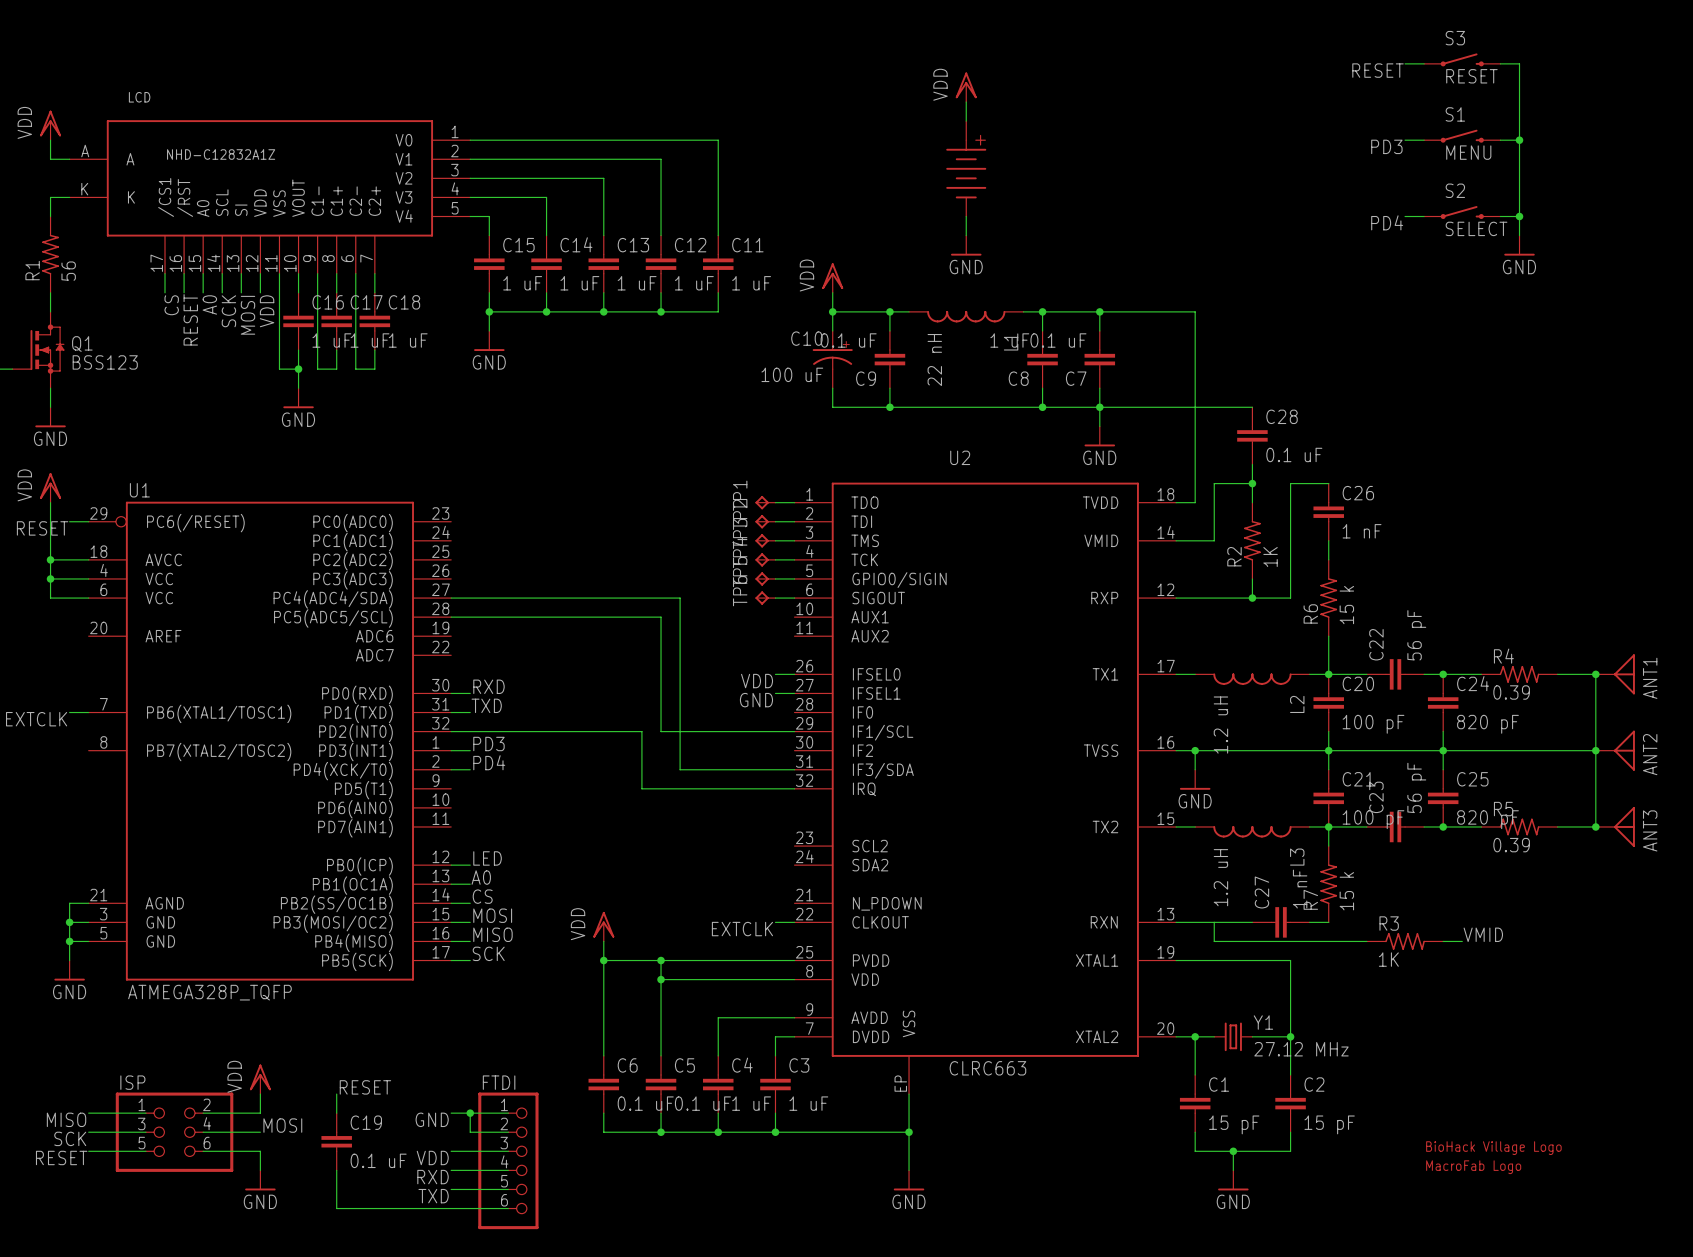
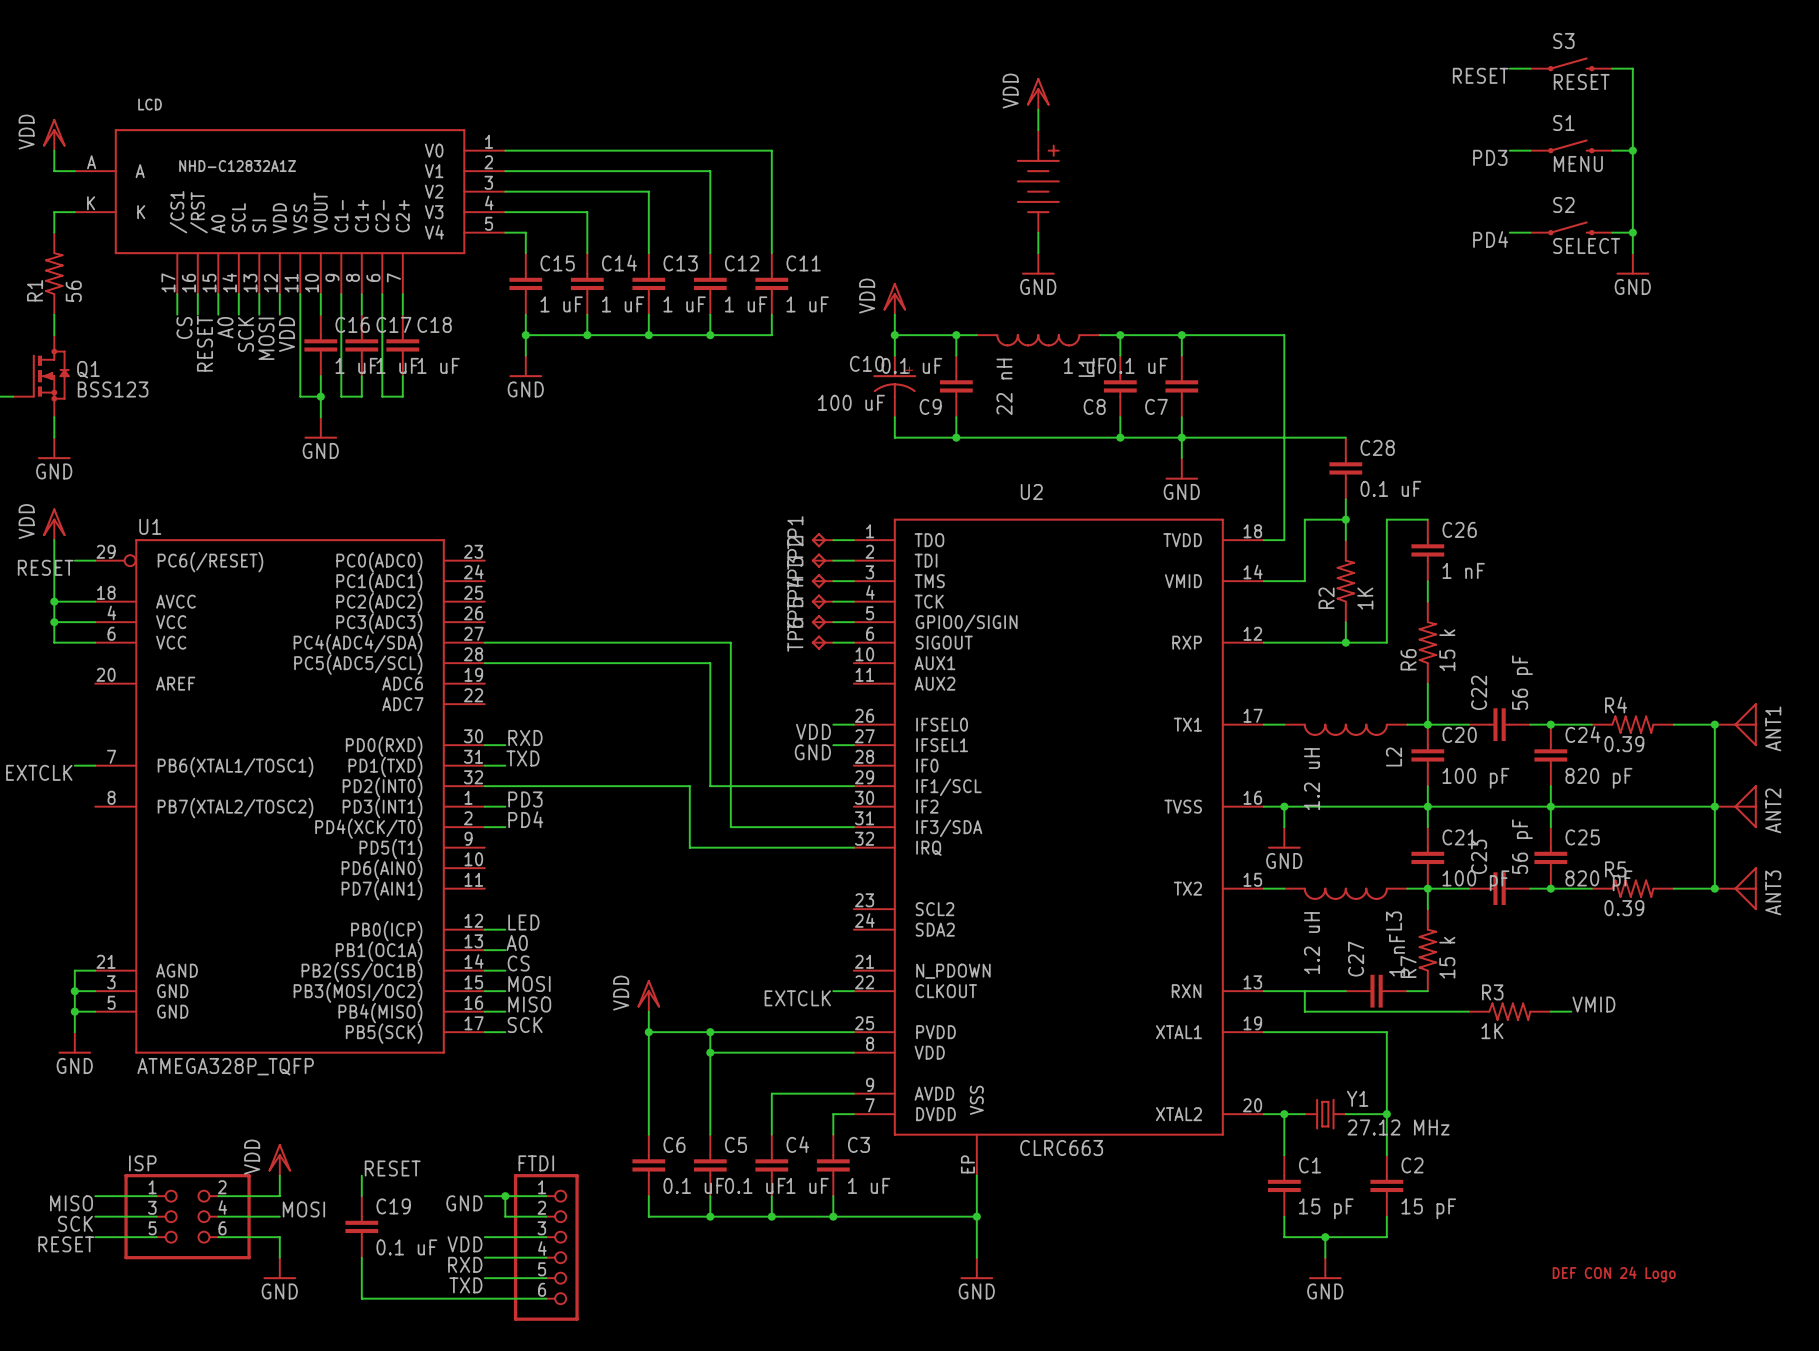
part: (1493, 1148) -> none
part: (1473, 1167) -> none
part: none -> (1614, 1274)

